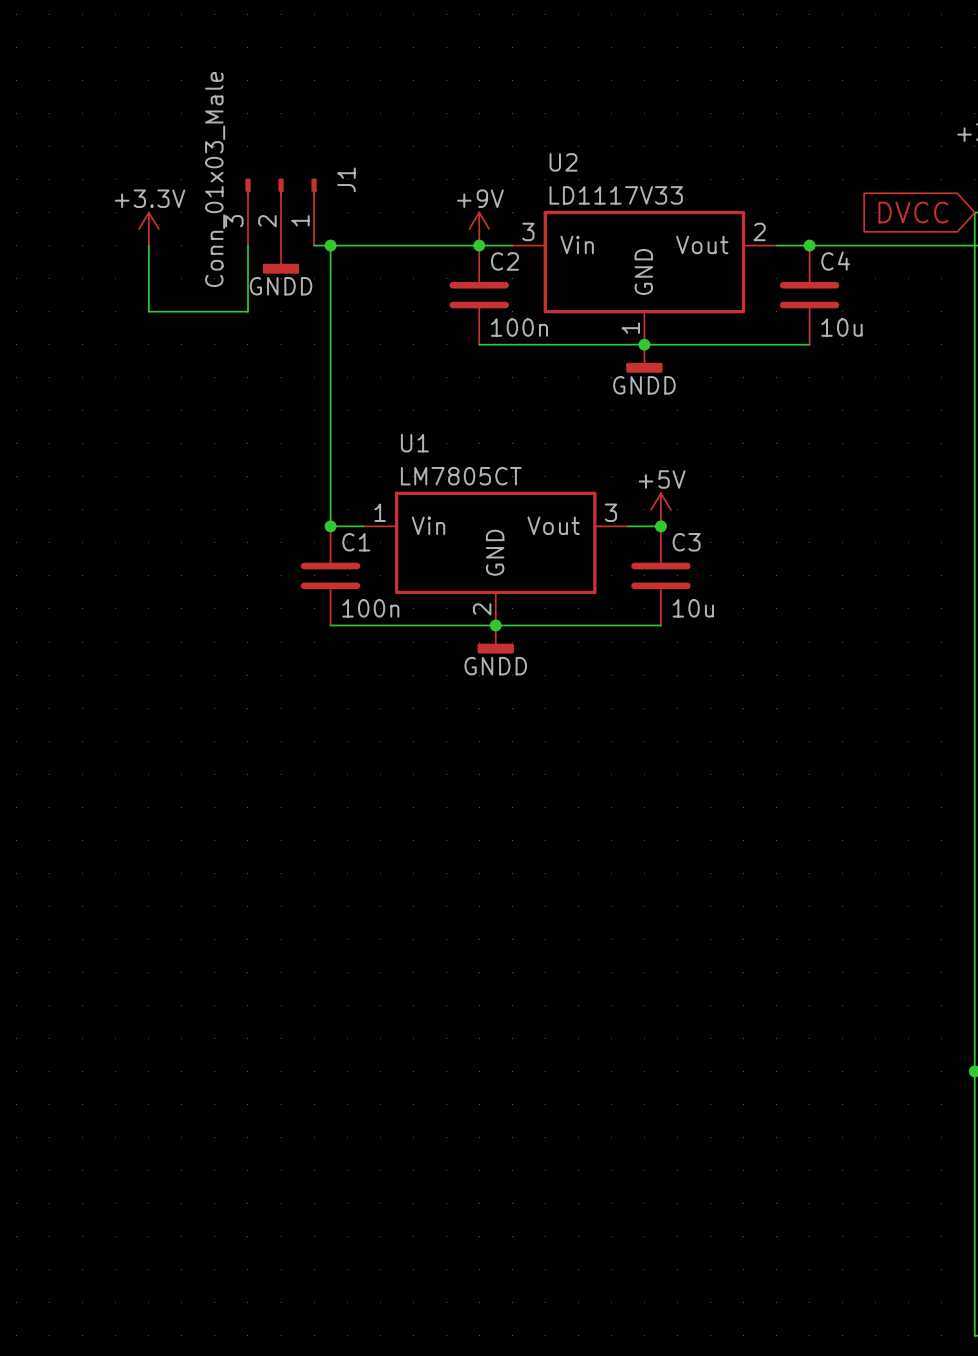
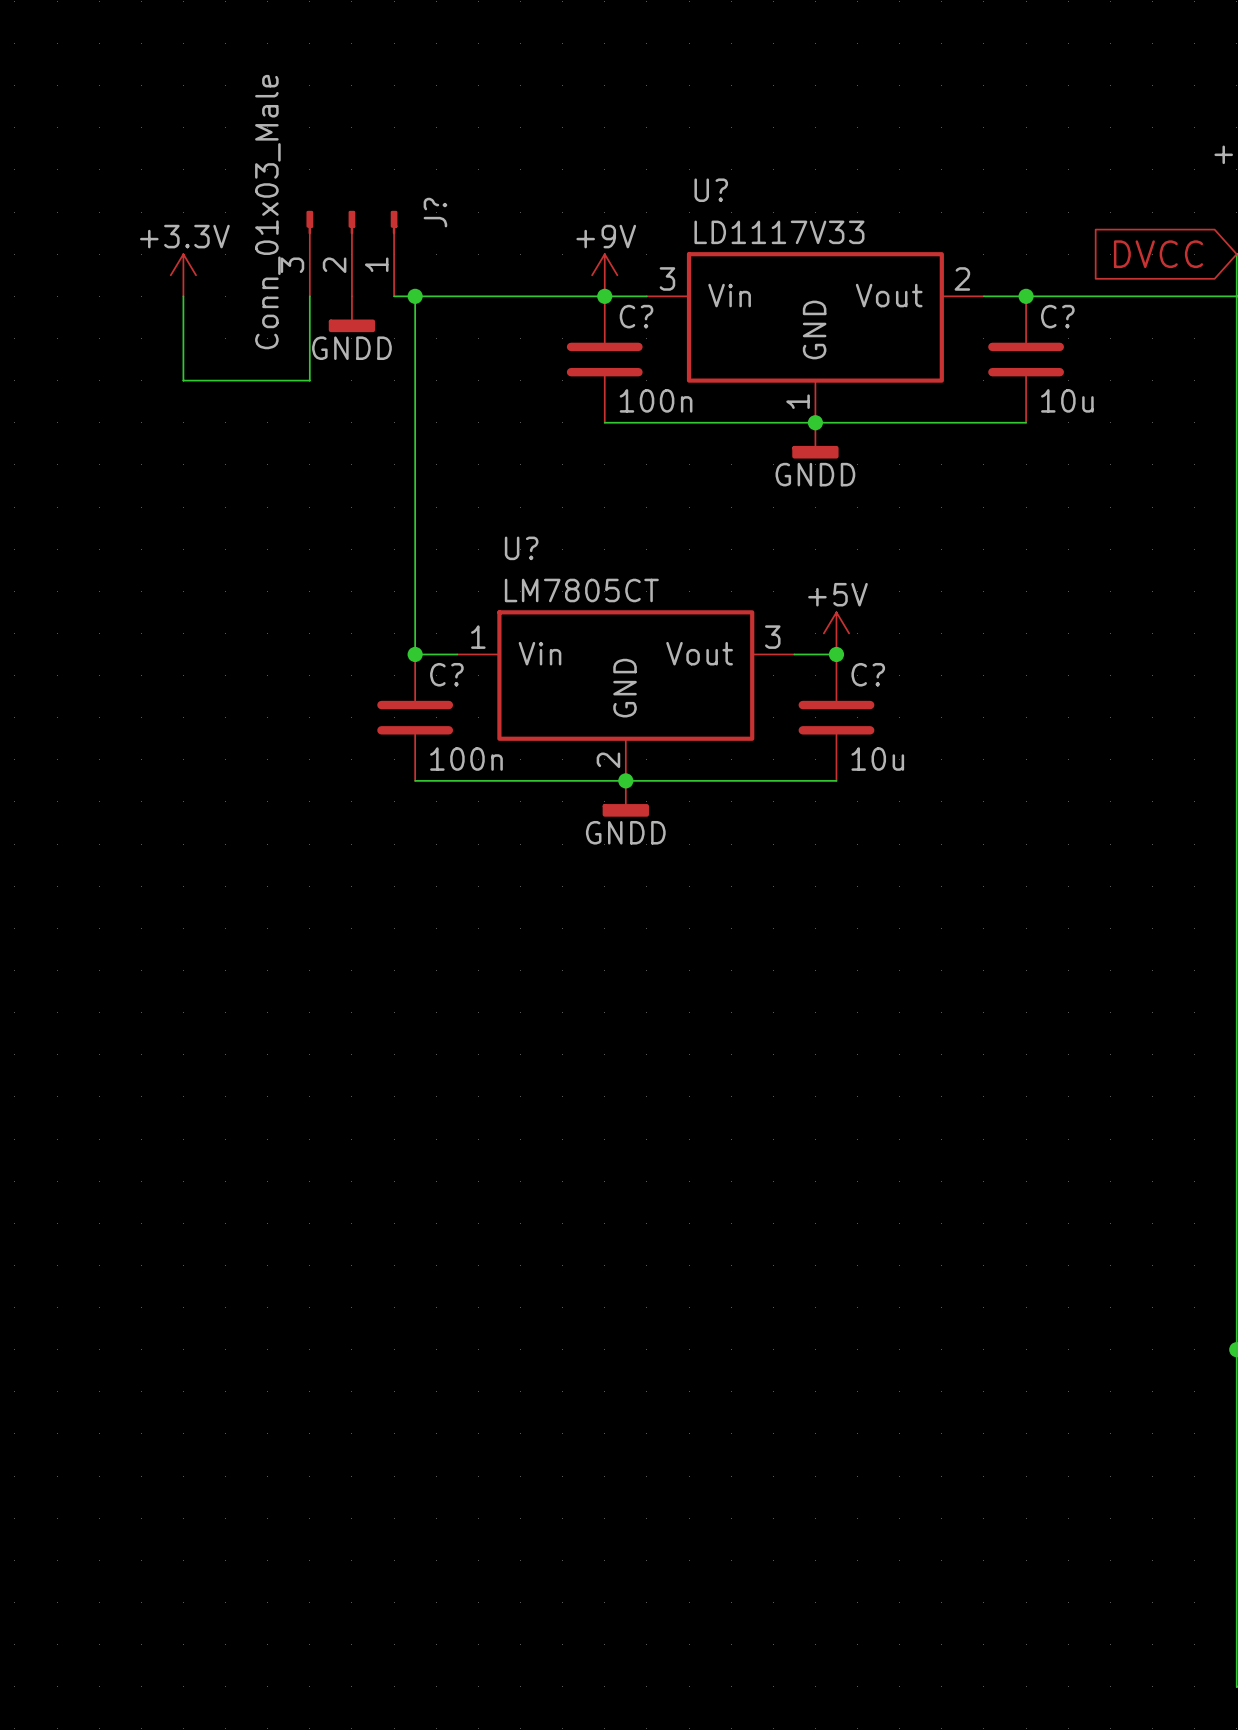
U2 name: U2 (563, 162) -> U? (711, 190)
J1 name: J1 (346, 179) -> J? (435, 212)
C2 name: C2 (504, 261) -> C? (636, 316)
C4 name: C4 (835, 261) -> C? (1057, 316)
U1 name: U1 (414, 443) -> U? (521, 548)
C1 name: C1 (356, 542) -> C? (446, 674)
C3 name: C3 (686, 542) -> C? (868, 674)

